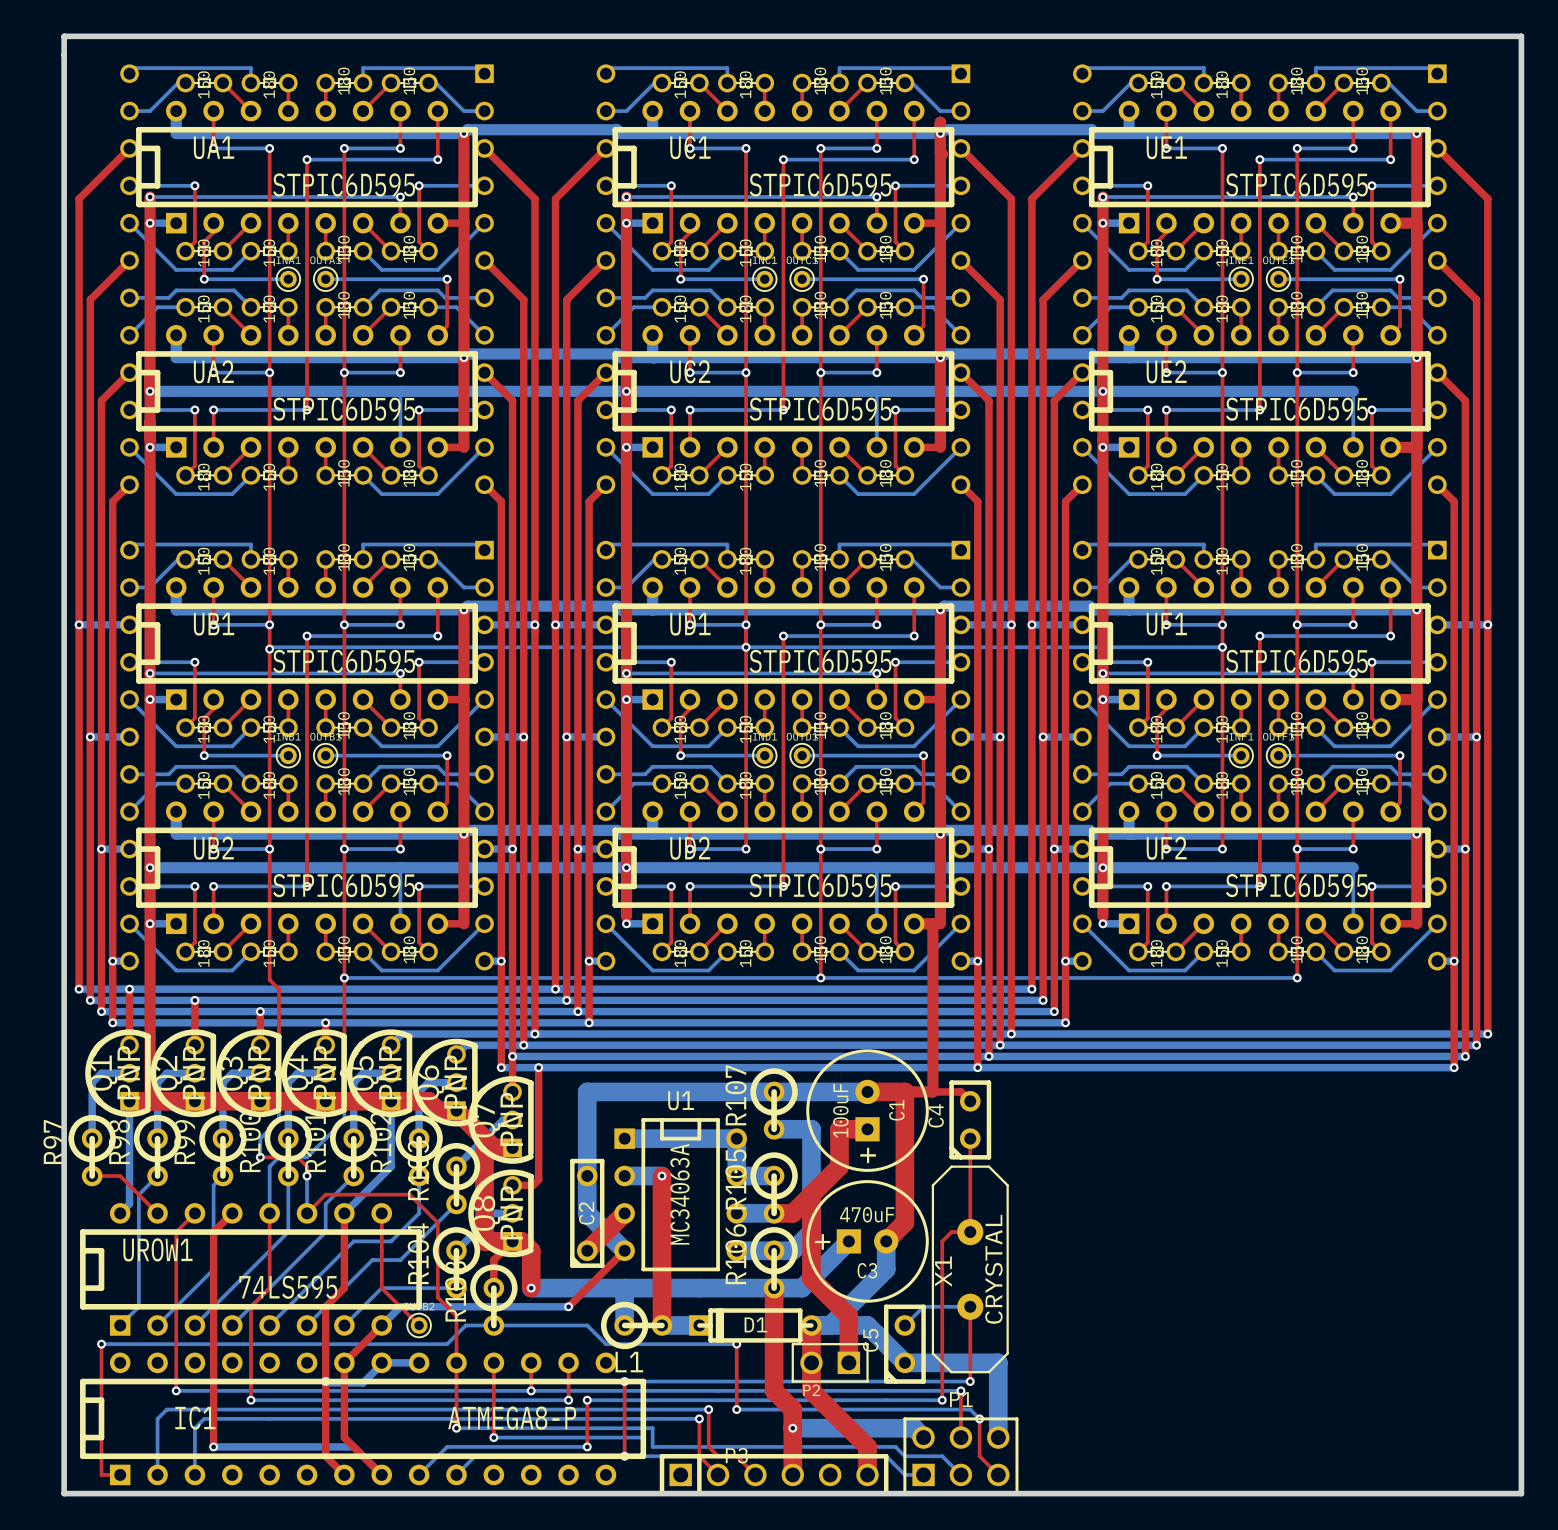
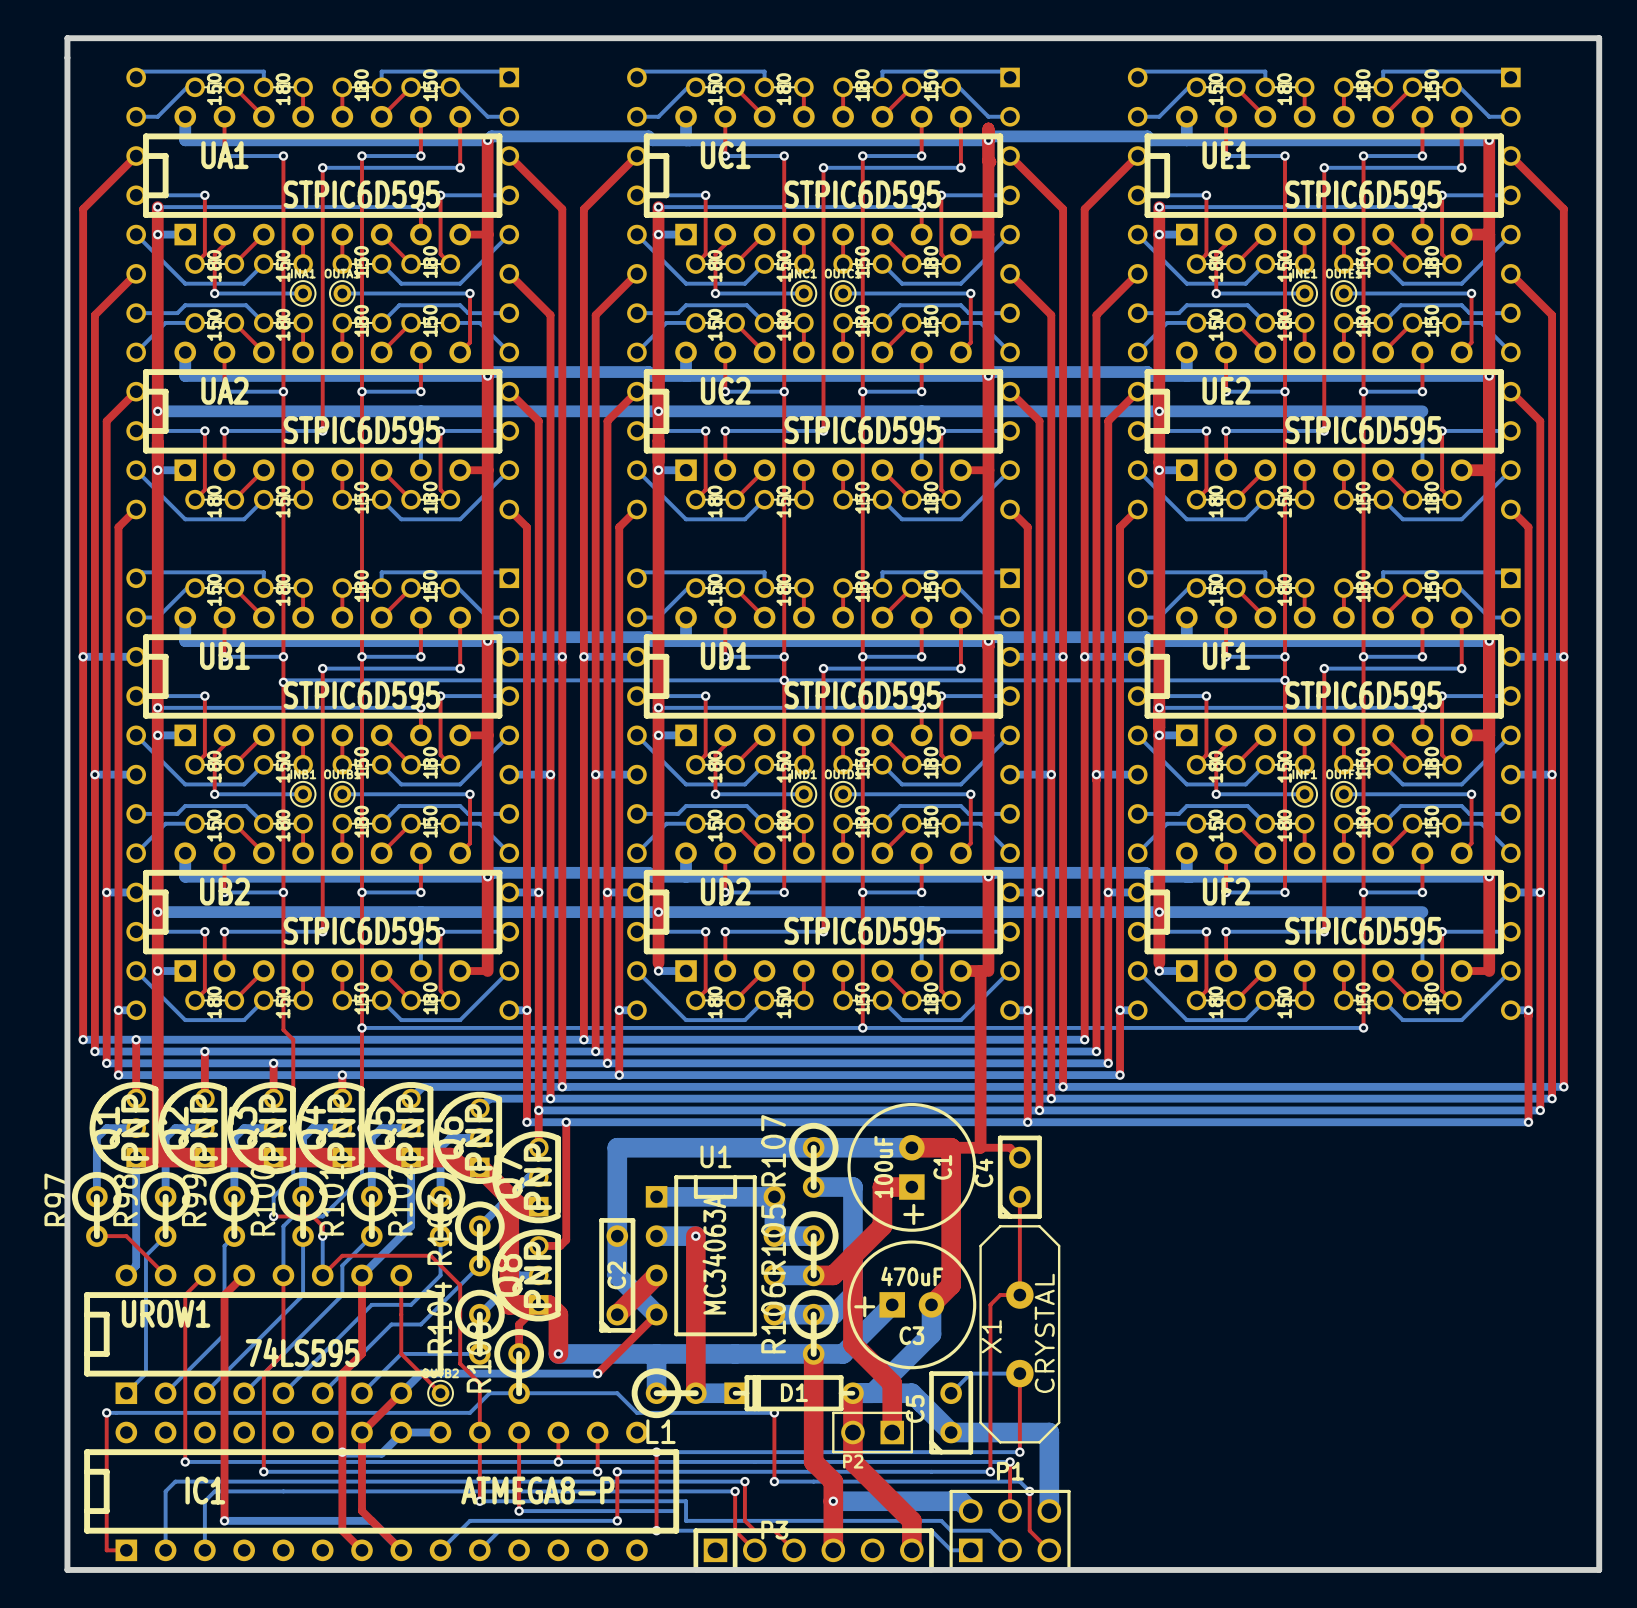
top track: none -> (487, 470) (487, 641)
top track: none -> (988, 470) (988, 641)

